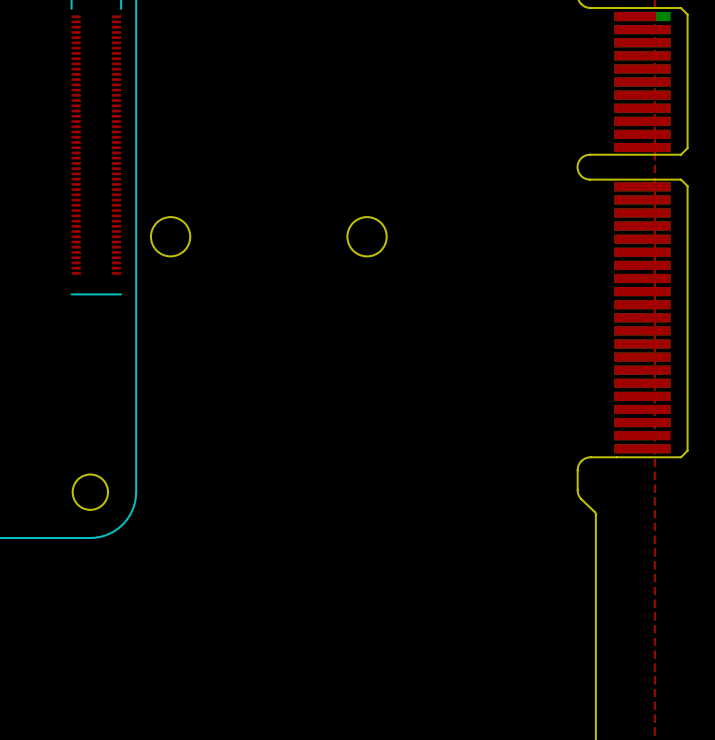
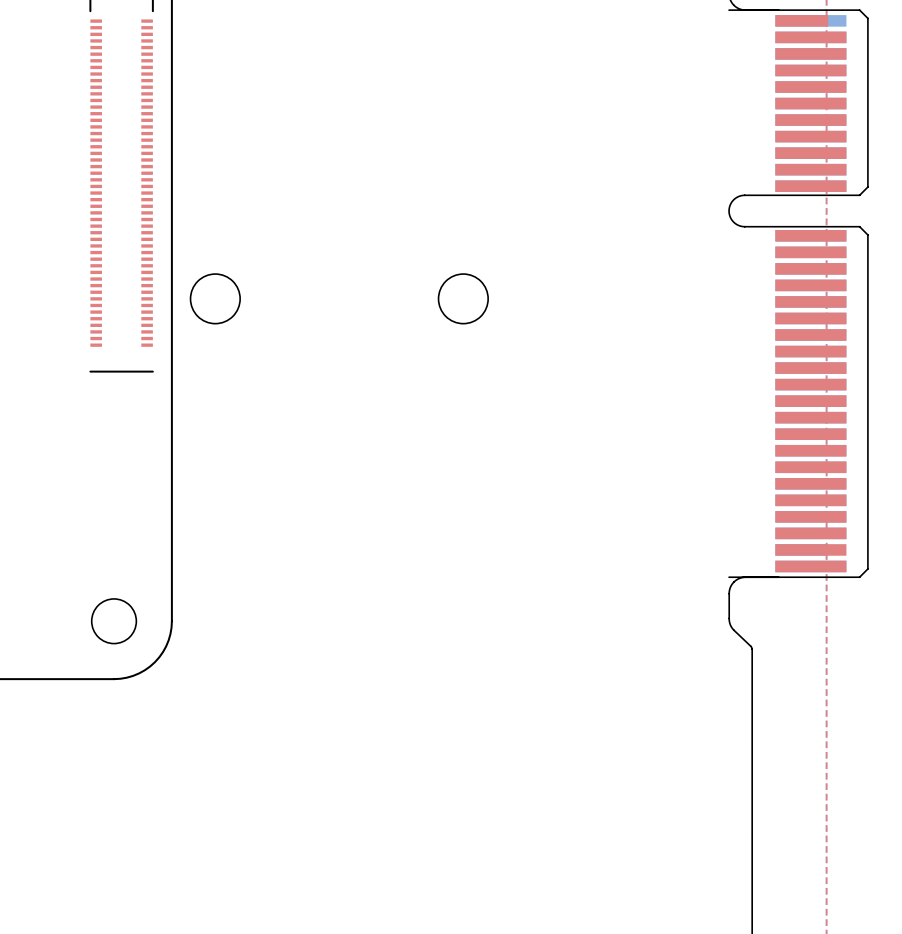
part footprint: [576, 7, 689, 458] -> [728, 9, 869, 579]

